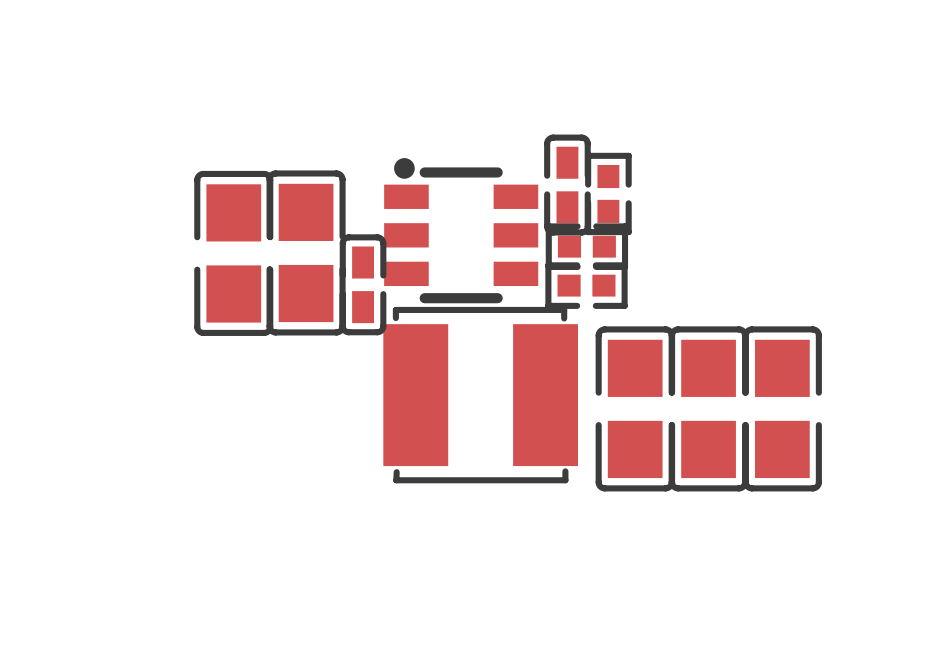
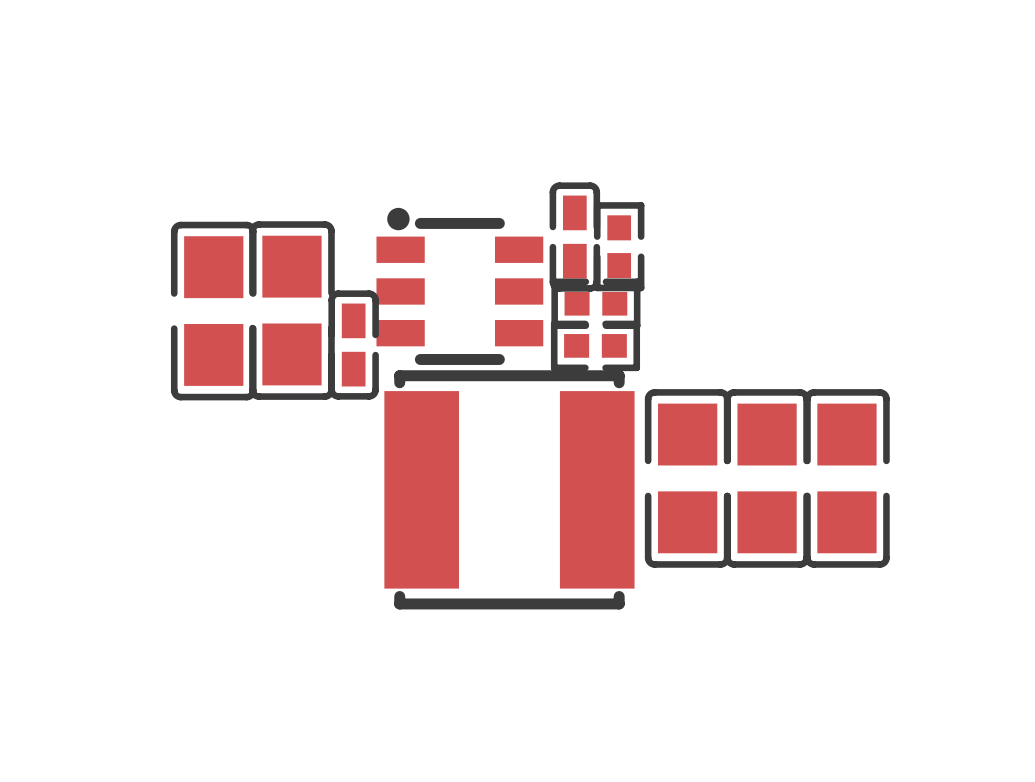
part footprint: [383, 306, 578, 484] -> [384, 370, 635, 610]
part: (635, 408) -> none
part: none -> (687, 478)
part: (708, 408) -> none
part: none -> (767, 478)
part: (782, 408) -> none
part: none -> (846, 478)

